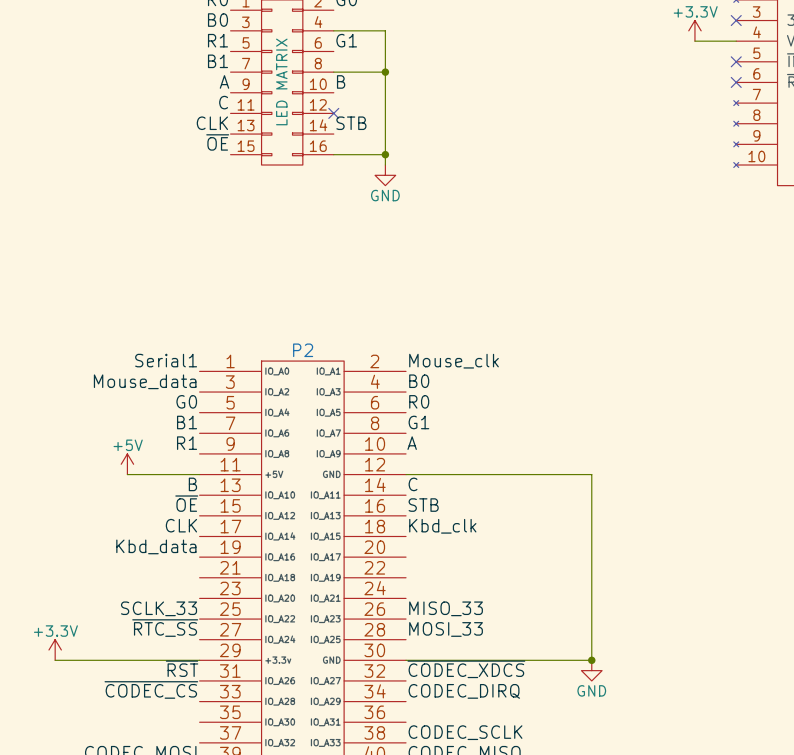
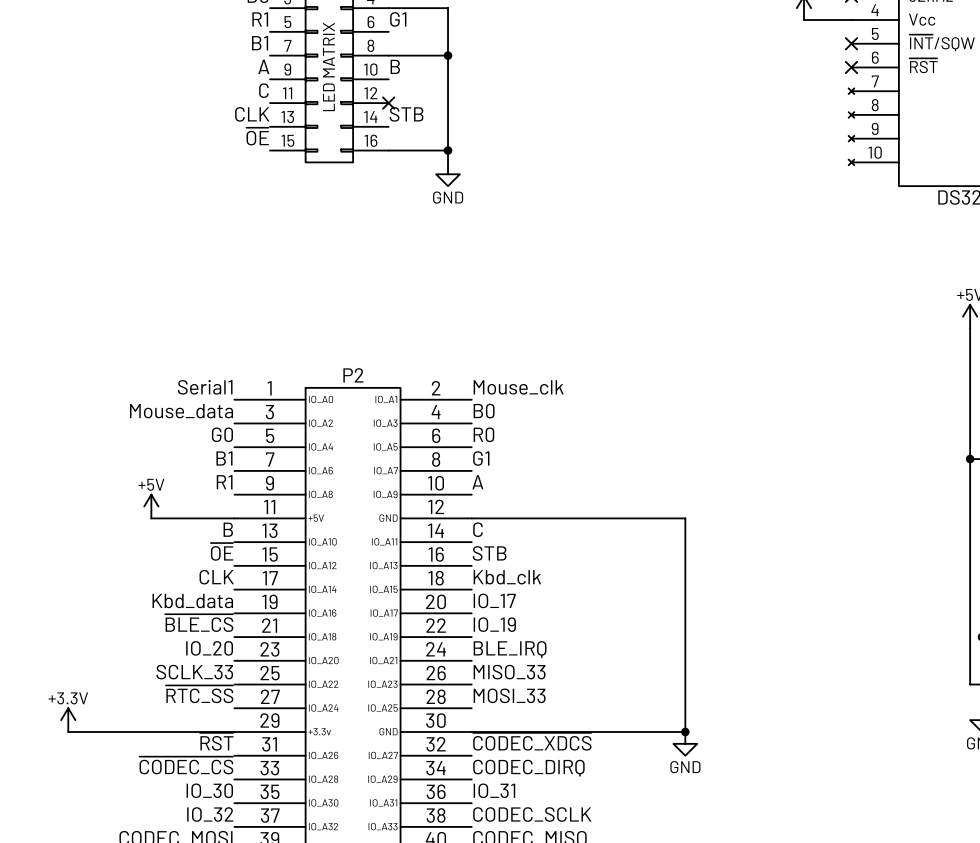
label: none -> IO_17 (494, 600)
label: none -> ~{BLE_CS} (199, 623)
label: none -> IO_19 (494, 624)
label: none -> IO_20 (209, 648)
label: none -> BLE_IRQ (510, 649)
label: none -> IO_30 (209, 790)
label: none -> IO_31 (494, 790)
label: none -> IO_32 (210, 814)

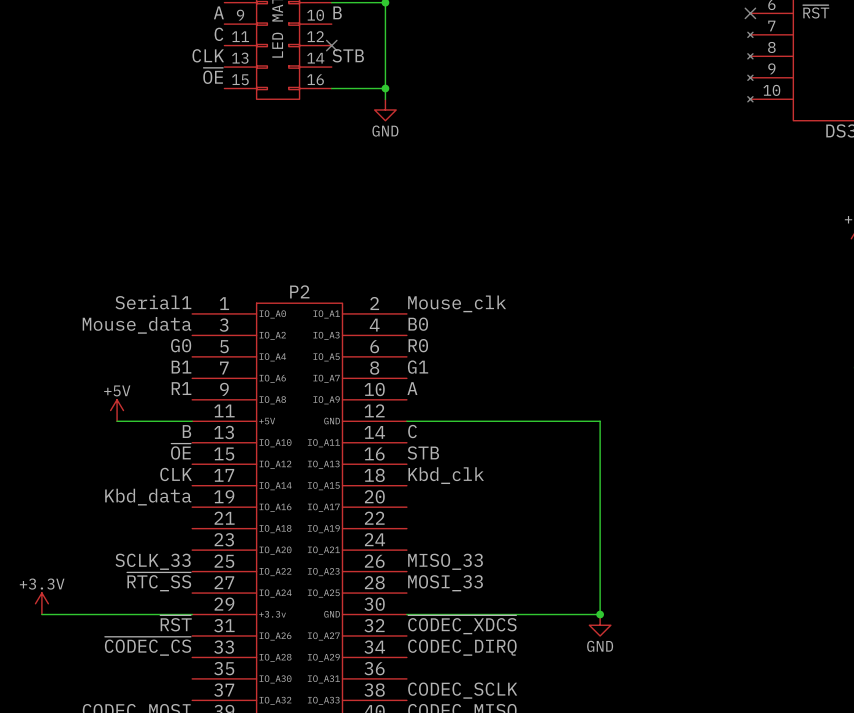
label: IO_17 (494, 600) -> none
label: ~{BLE_CS} (199, 623) -> none
label: IO_19 (494, 624) -> none
label: IO_20 (209, 648) -> none
label: BLE_IRQ (510, 649) -> none
label: IO_30 (209, 790) -> none
label: IO_31 (494, 790) -> none
label: IO_32 (210, 814) -> none

